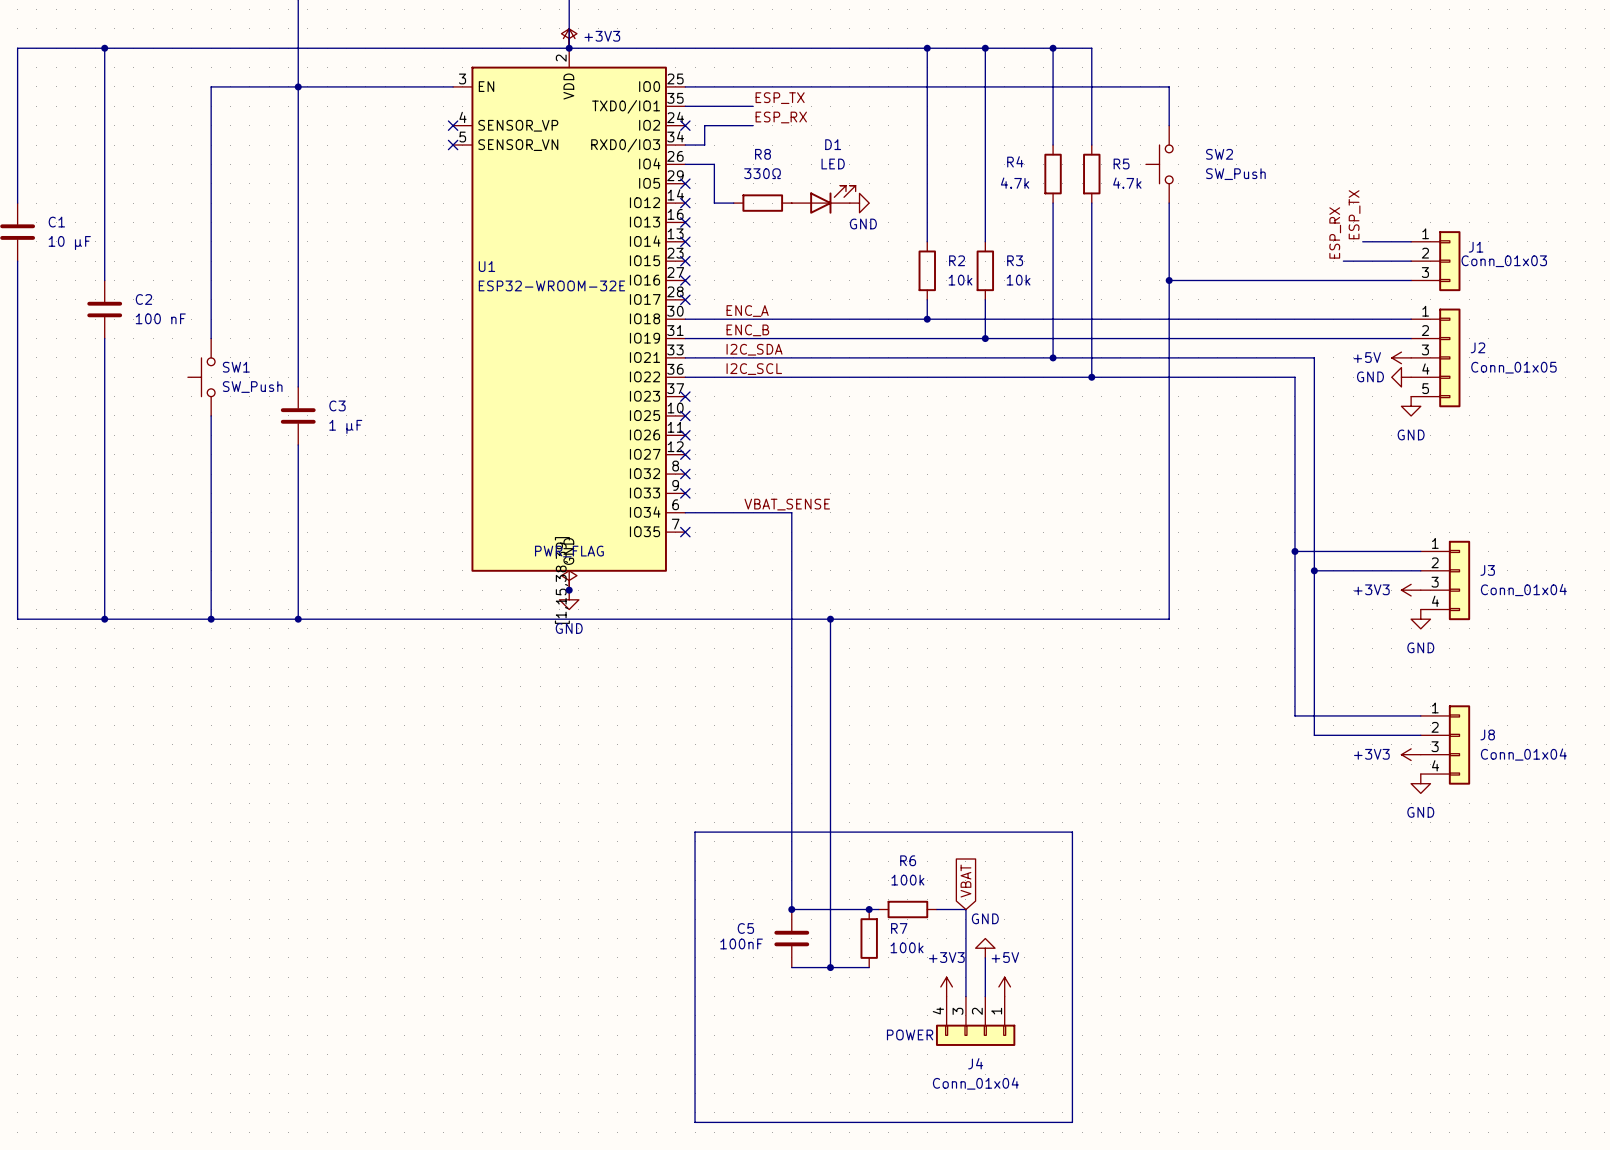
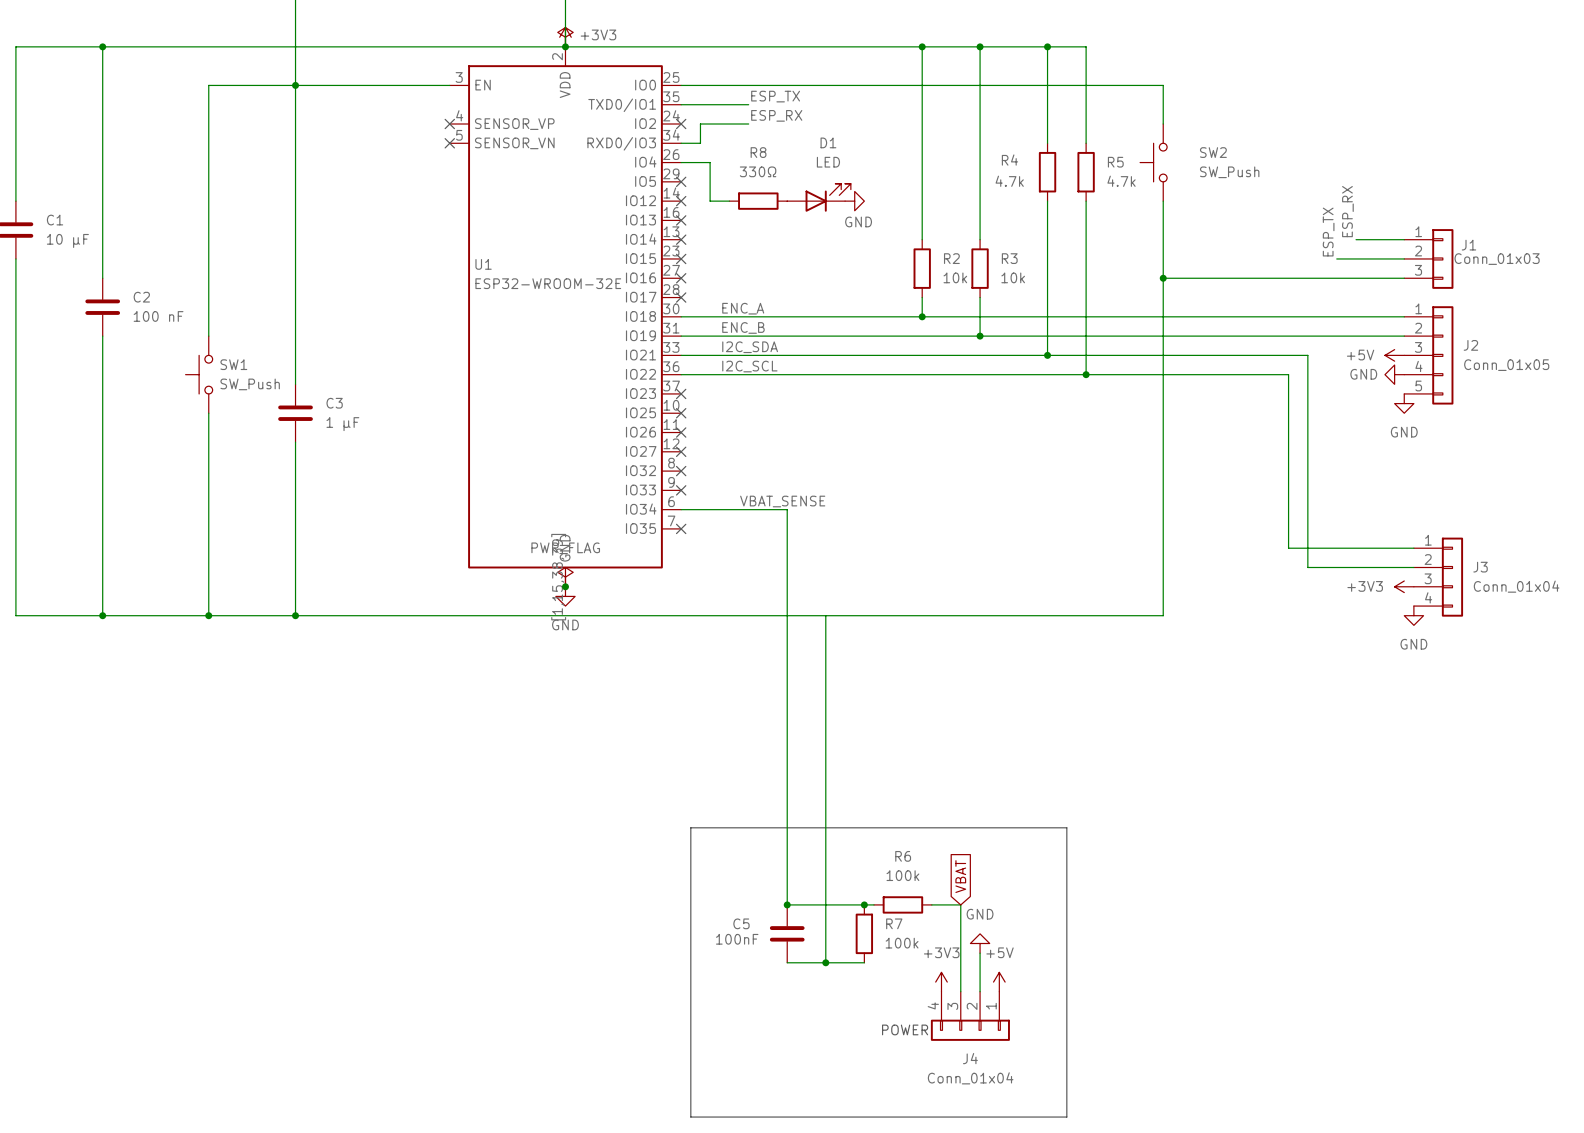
label: ESP_TX (1354, 214) -> ESP_RX (1347, 211)
label: ESP_RX (1335, 232) -> ESP_TX (1328, 232)
wire: (1294, 551) (1294, 715) (1420, 715) -> none
junction: (1294, 551) -> none
wire: (1314, 570) (1314, 735) (1420, 735) -> none
junction: (1314, 570) -> none
junction: (830, 619) -> none
J8: Conn_01x04 (1445, 744) -> none
power symbol: +3V3 (1411, 754) -> none
power symbol: GND (1420, 783) -> none

